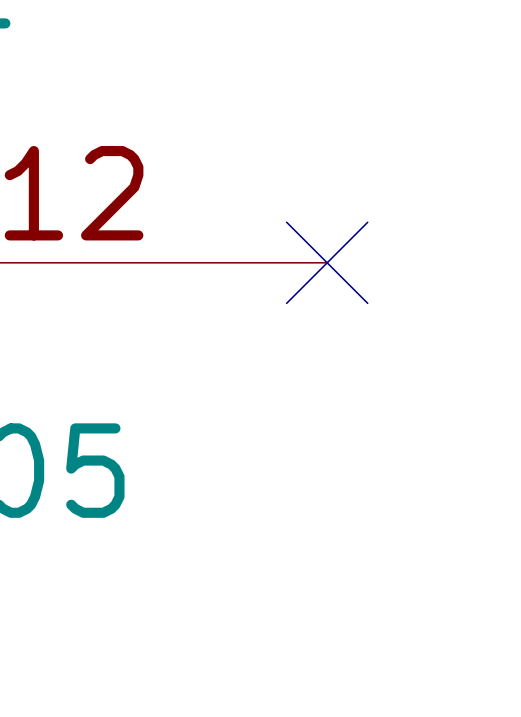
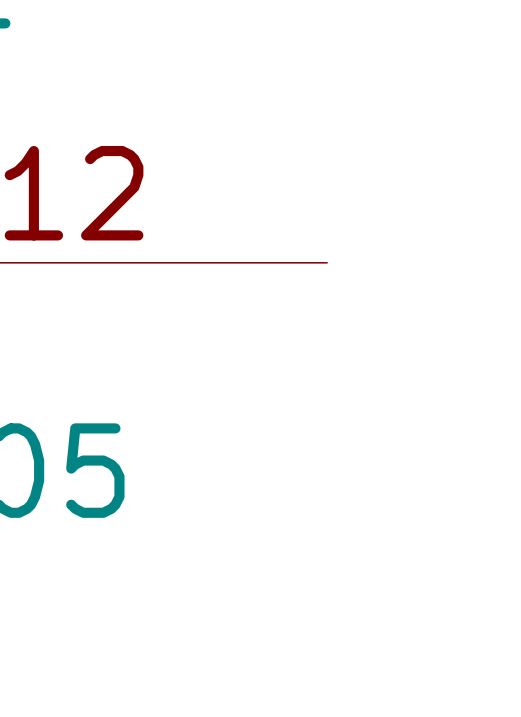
no-connect mark: (327, 262) -> none

